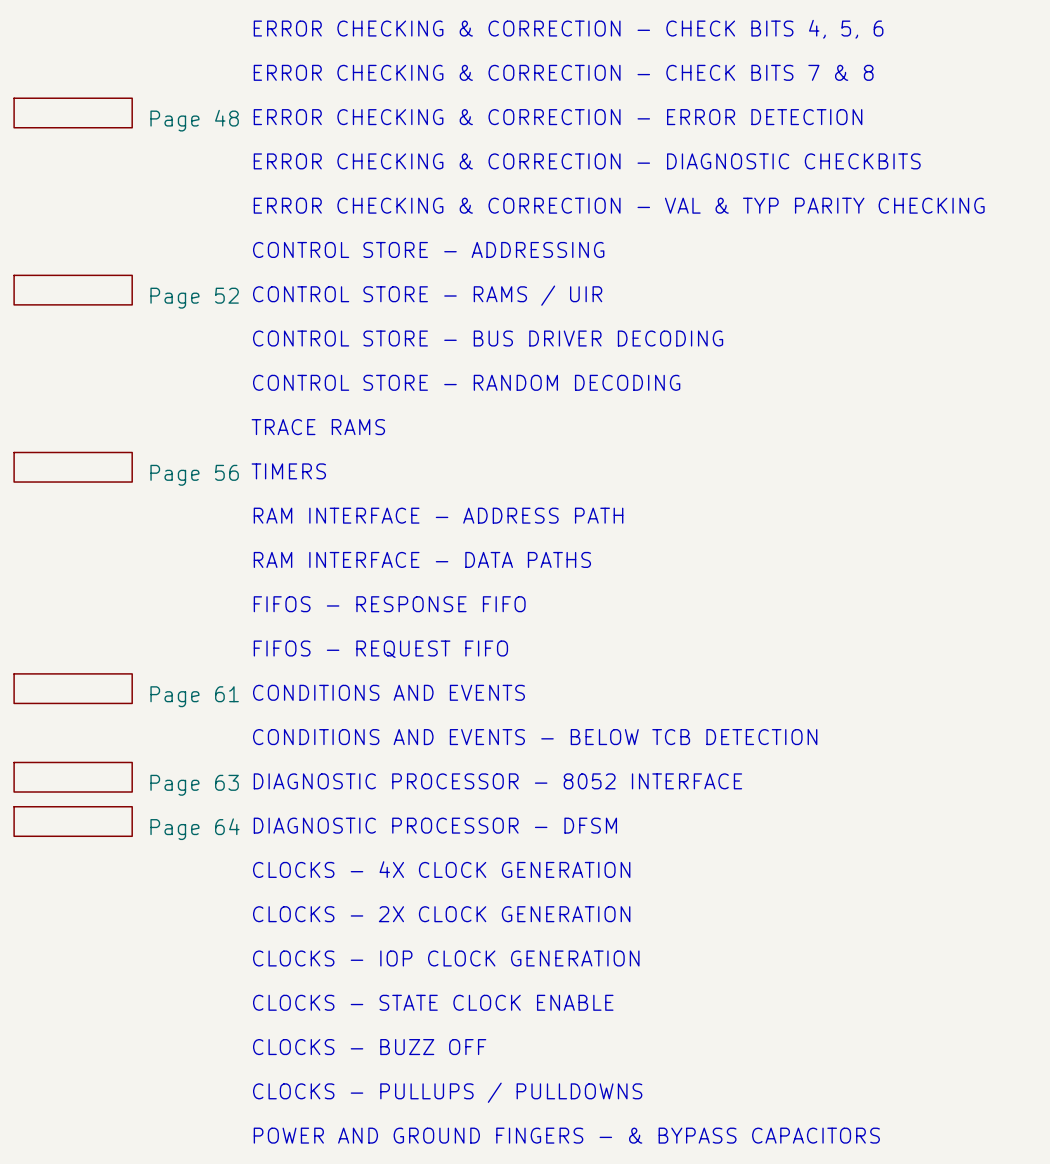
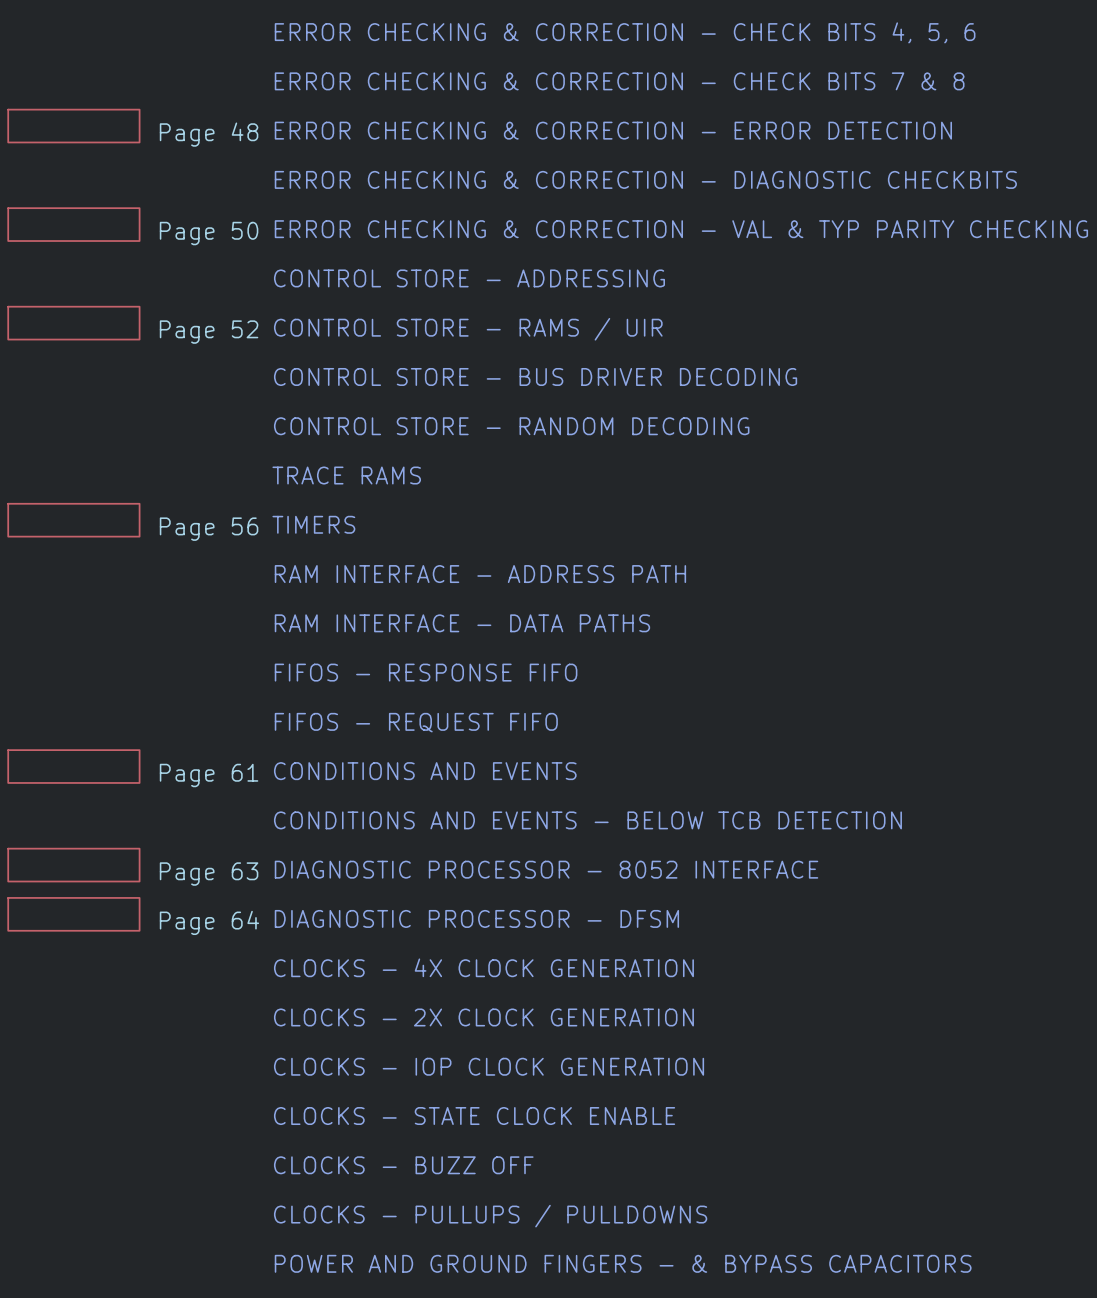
sheet Page 50: none -> (73, 224)

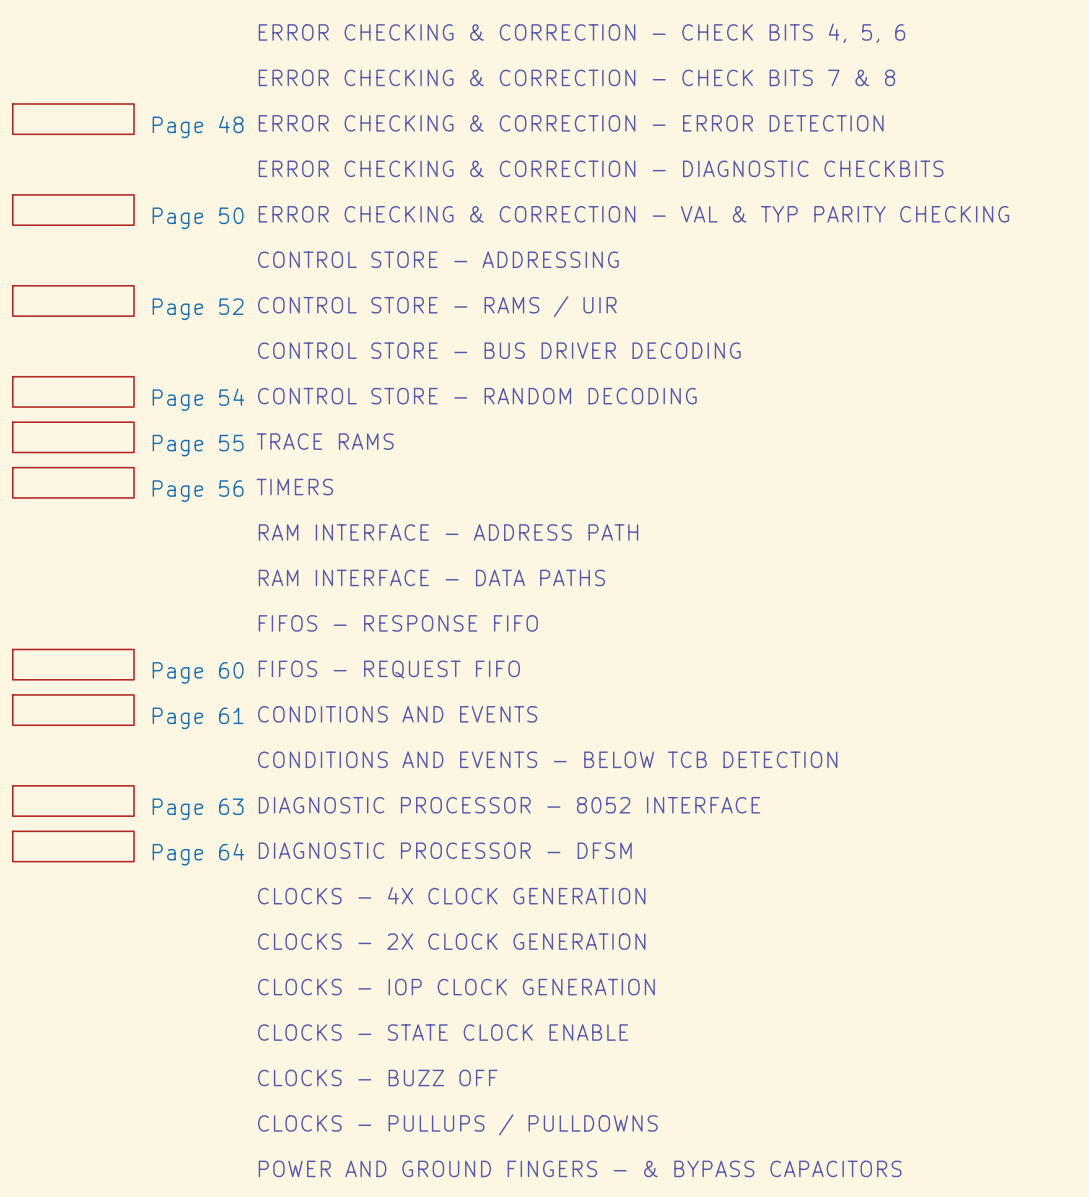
sheet Page 54: none -> (73, 391)
sheet Page 55: none -> (73, 437)
sheet Page 60: none -> (73, 664)

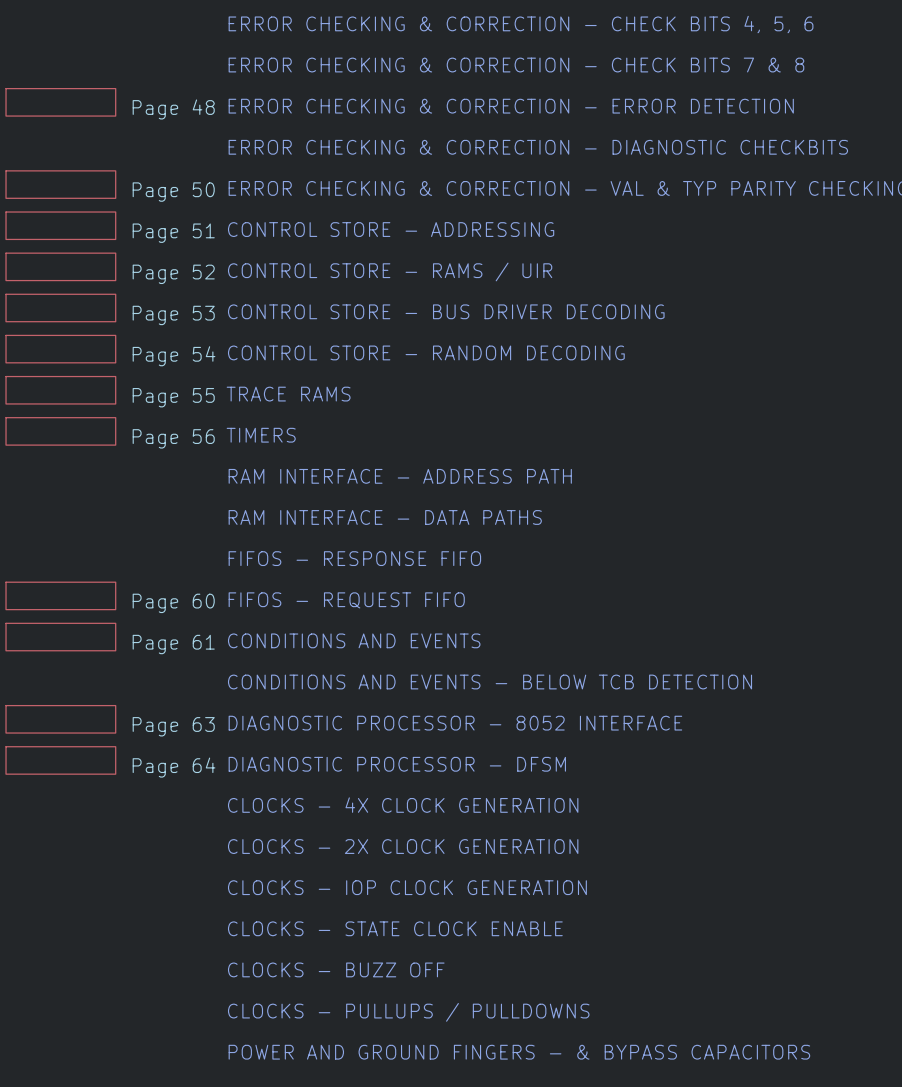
sheet Page 51: none -> (60, 225)
sheet Page 53: none -> (60, 307)

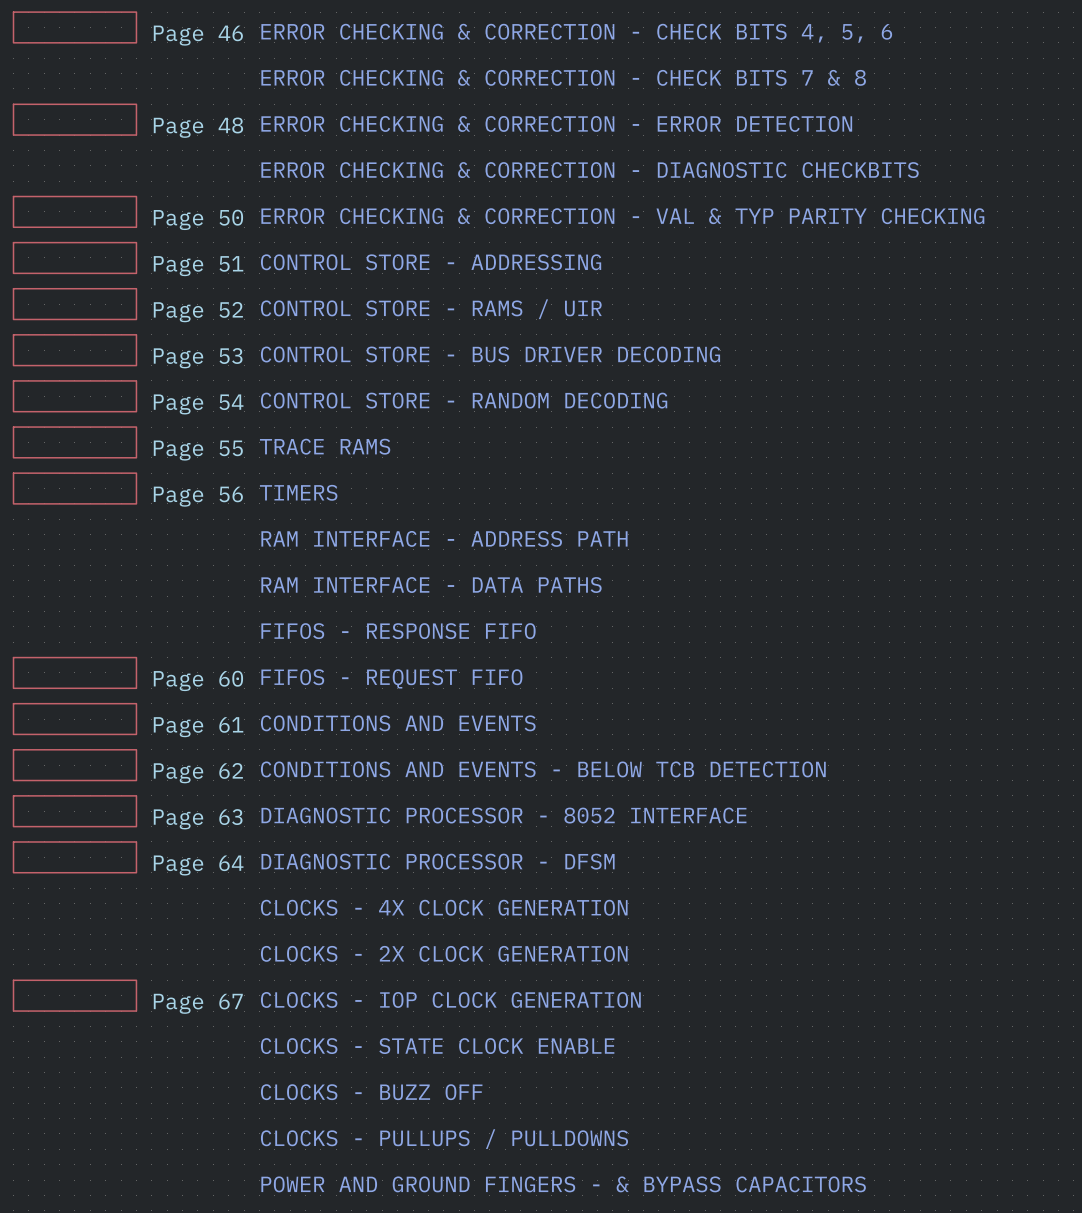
sheet Page 46: none -> (74, 27)
sheet Page 62: none -> (74, 765)
sheet Page 67: none -> (74, 995)

